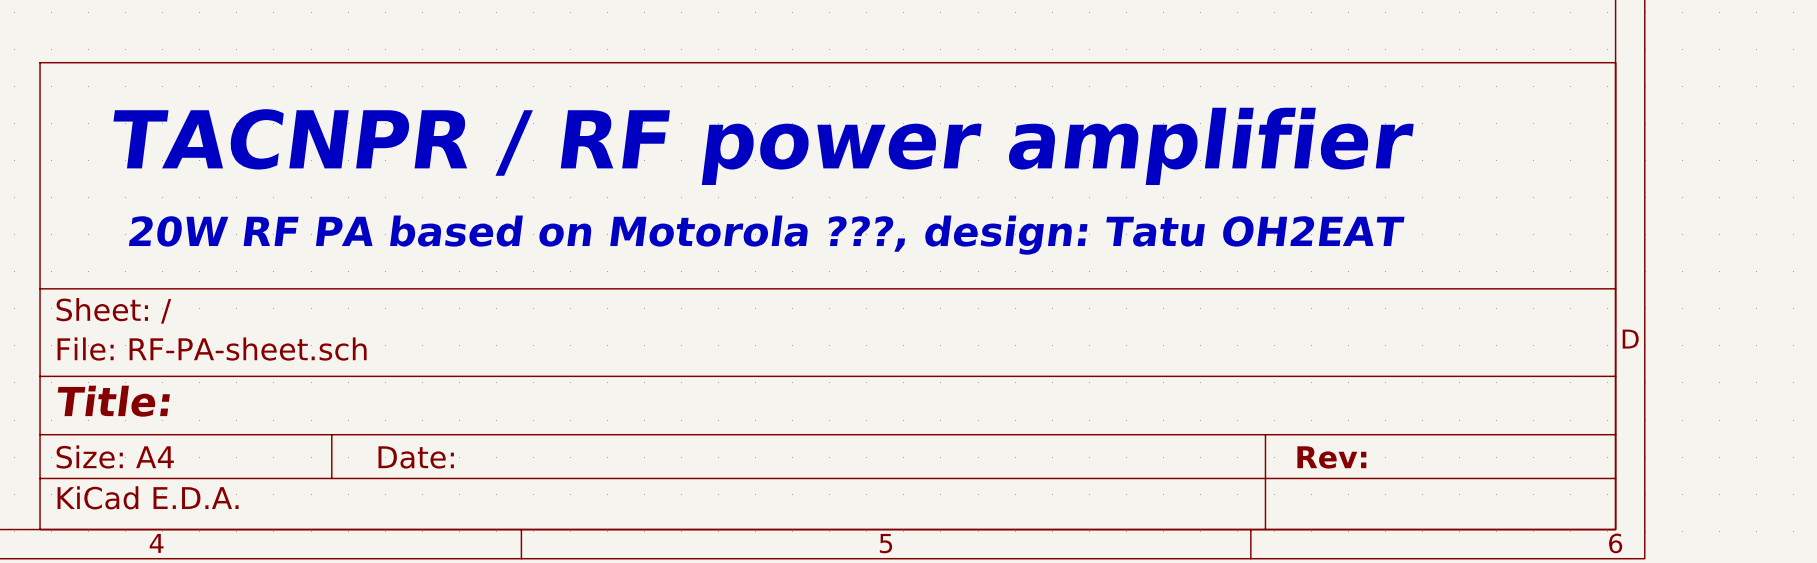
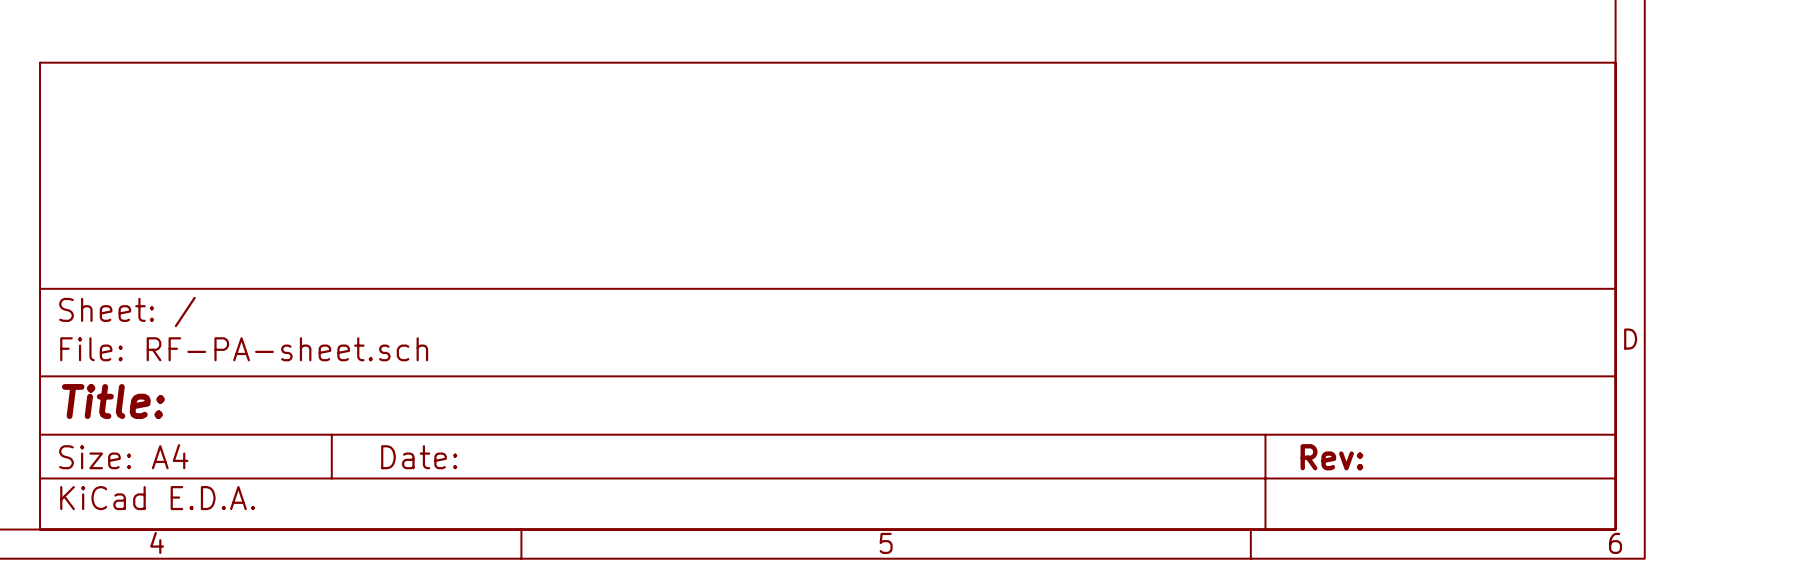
text: TACNPR / RF power amplifier (763, 146) -> none
text: 20W RF PA based on Motorola ???, design: Tatu OH2EAT (766, 235) -> none

